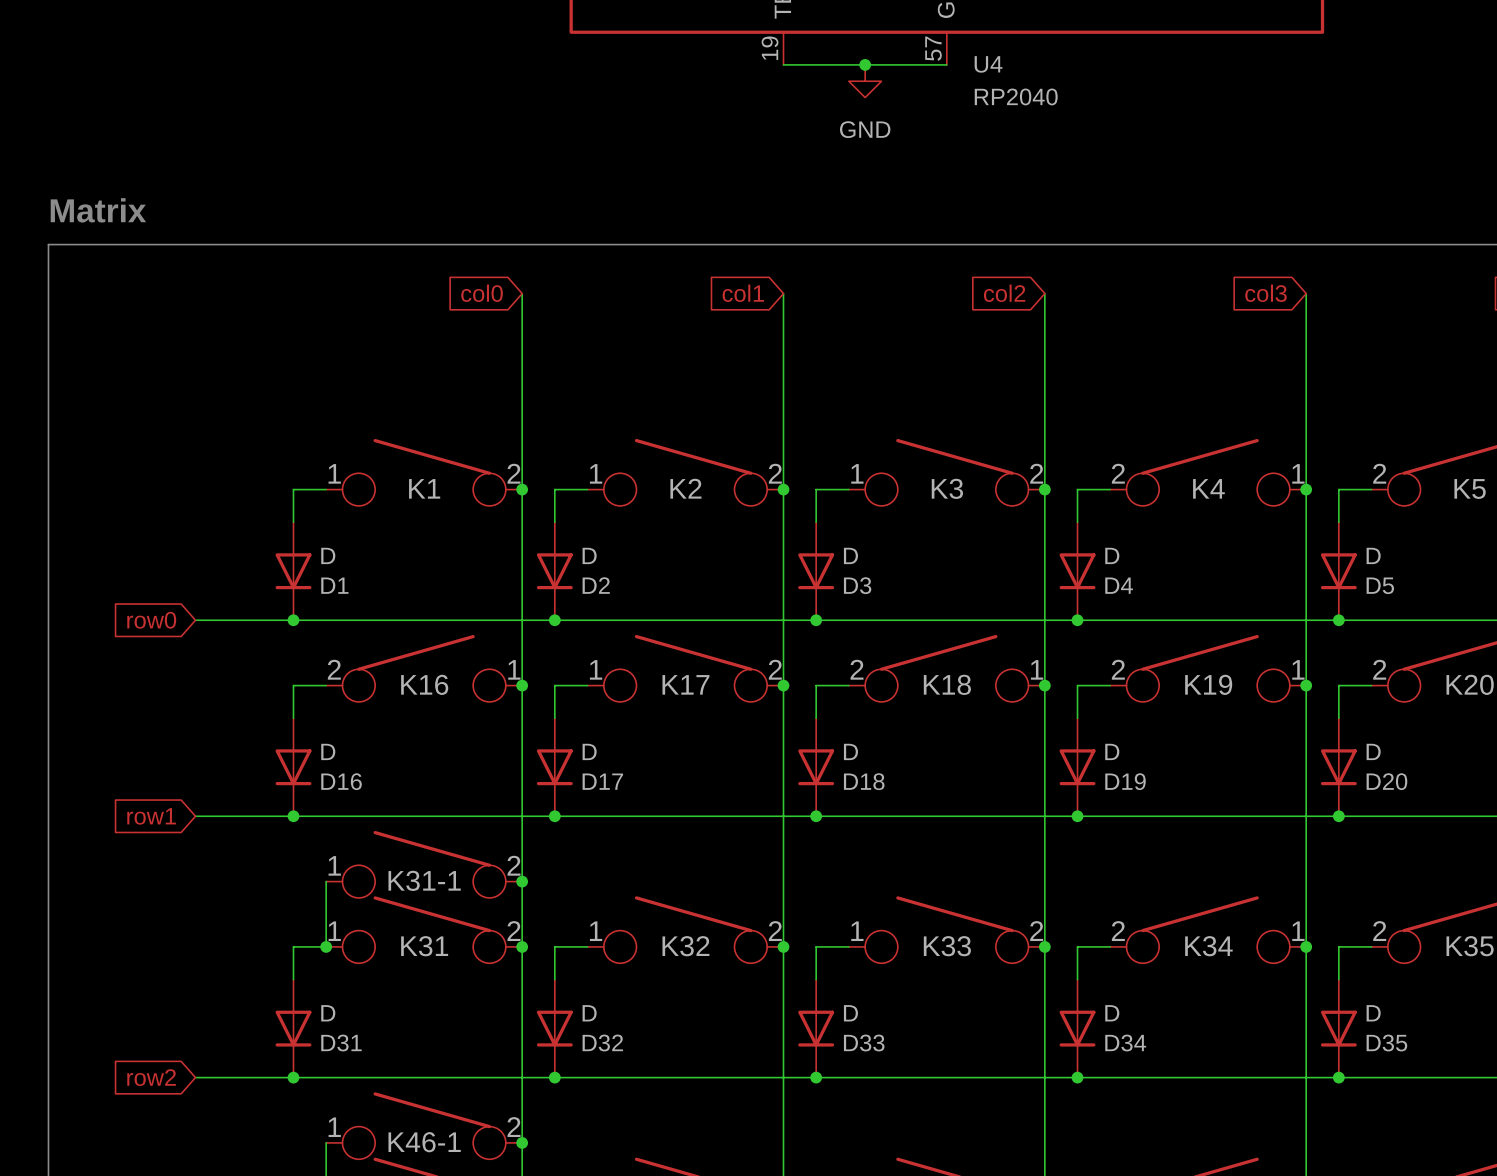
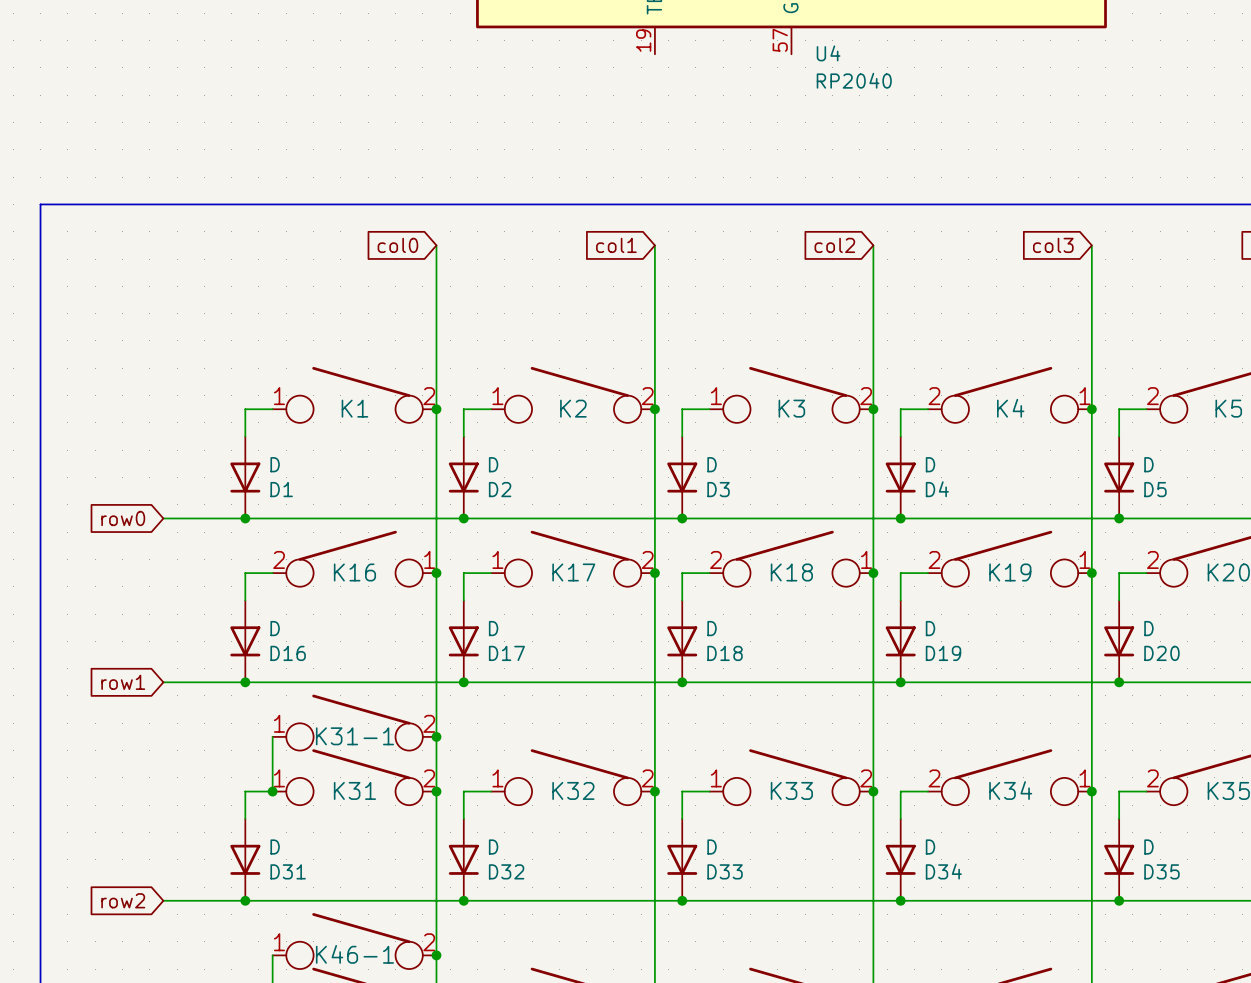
wire: (783, 64) (946, 64) -> none
junction: (865, 64) -> none
power symbol: GND (865, 81) -> none
text: Matrix (98, 210) -> none

